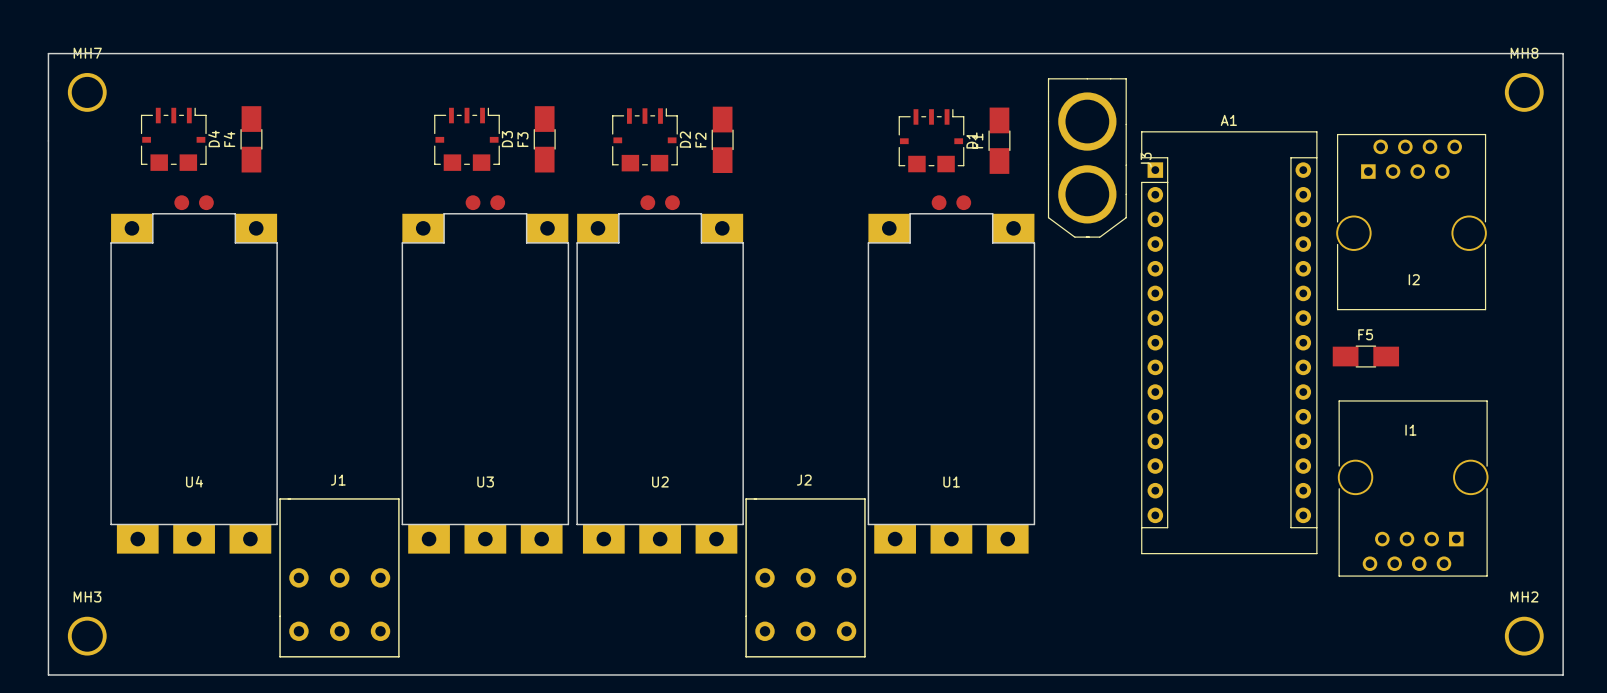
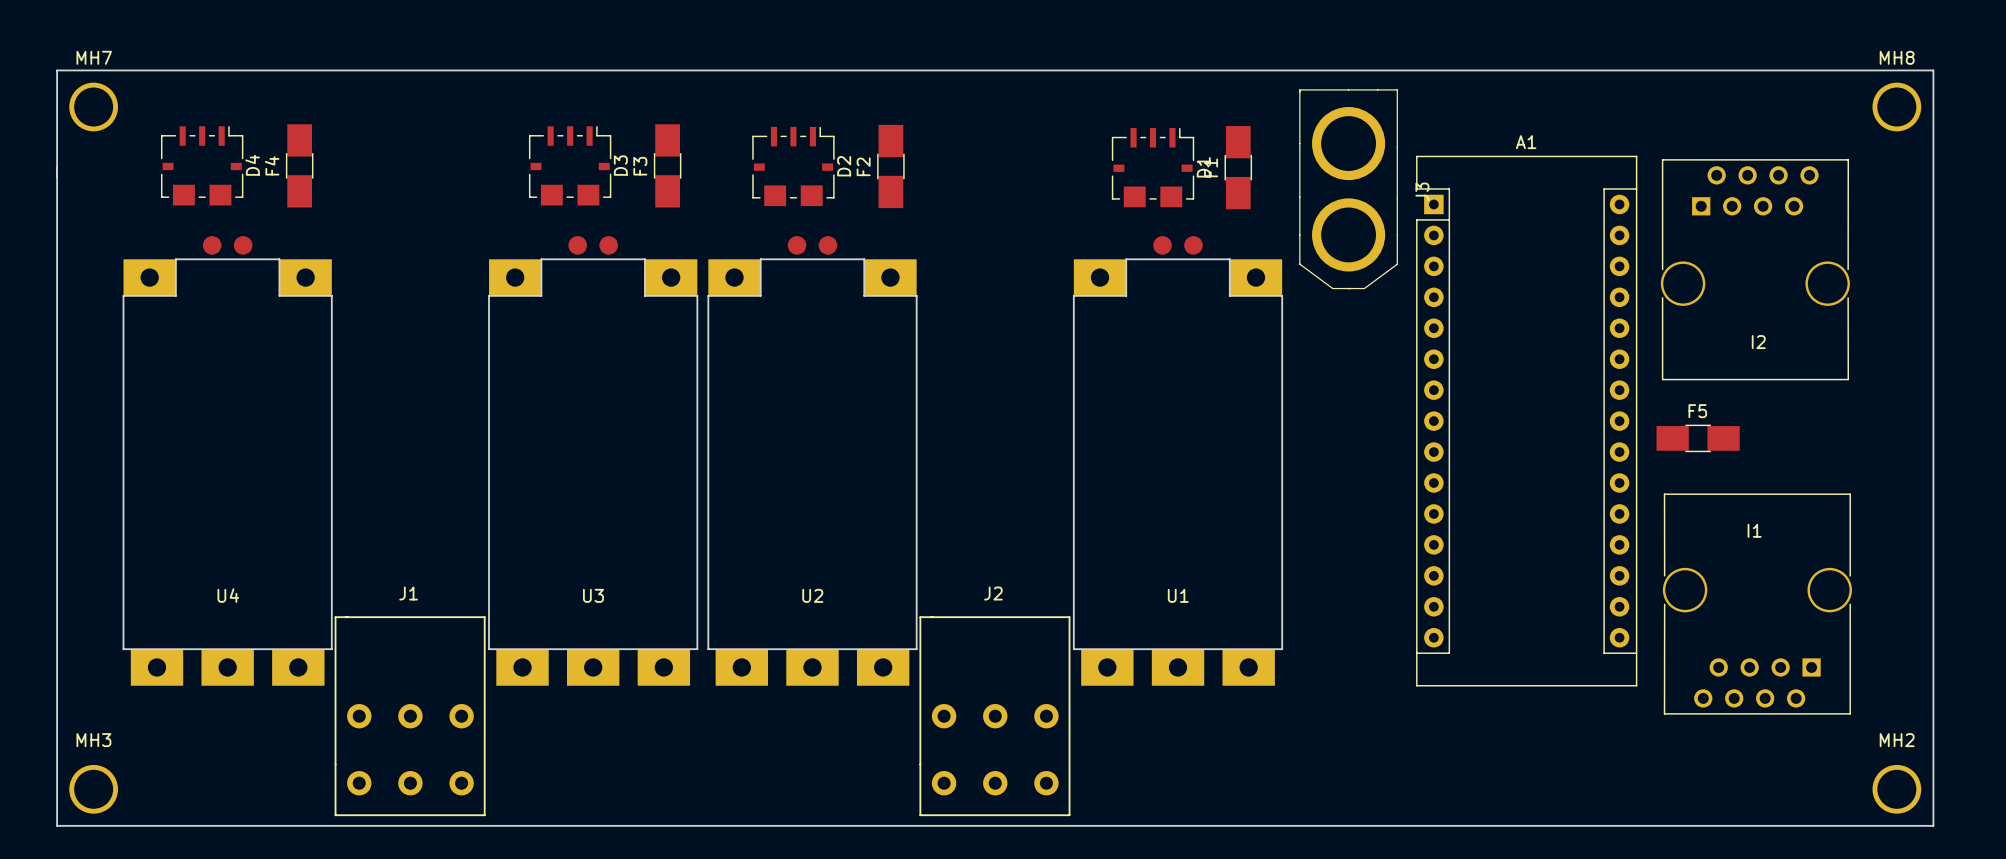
board edge: (48, 53) (48, 674) (1563, 674) (1563, 53) (48, 53) -> (1933, 70) (57, 70) (57, 825) (1933, 825) (1933, 70)

